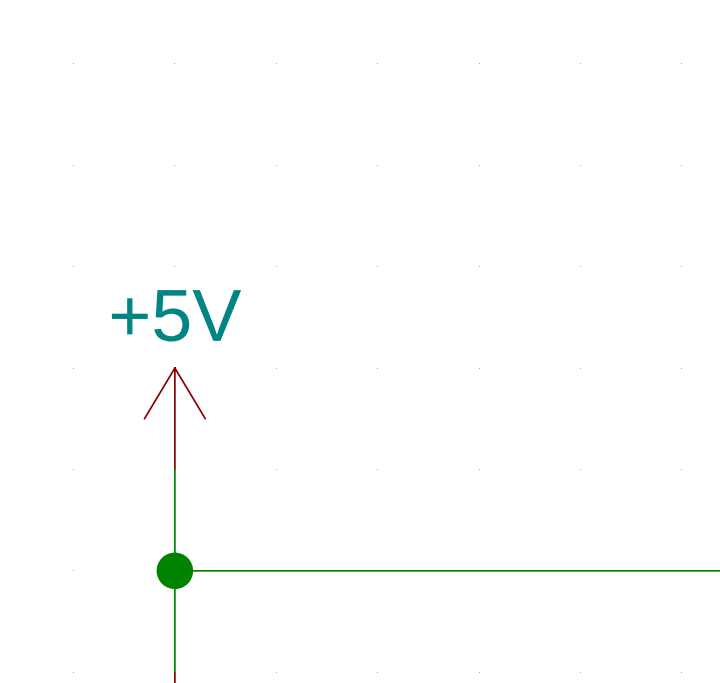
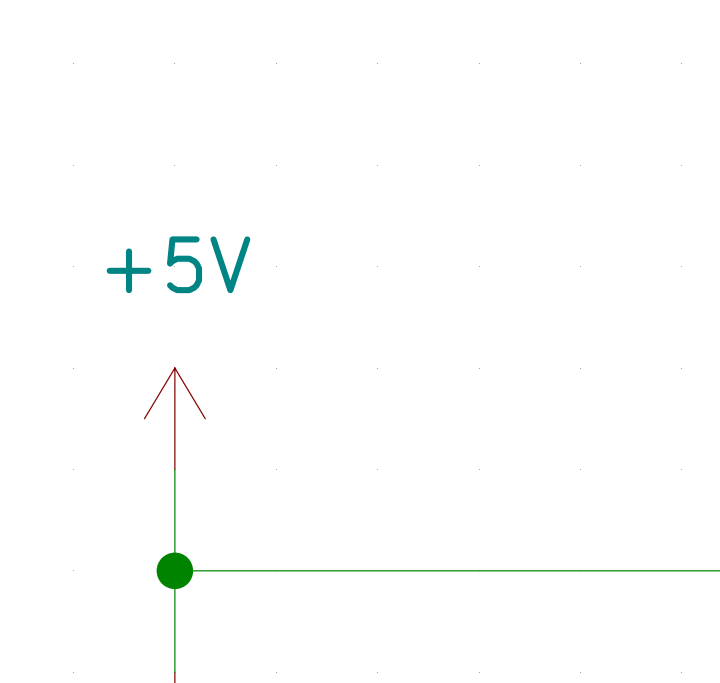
power symbol text position: +5V (176, 315) -> +5V (178, 264)

